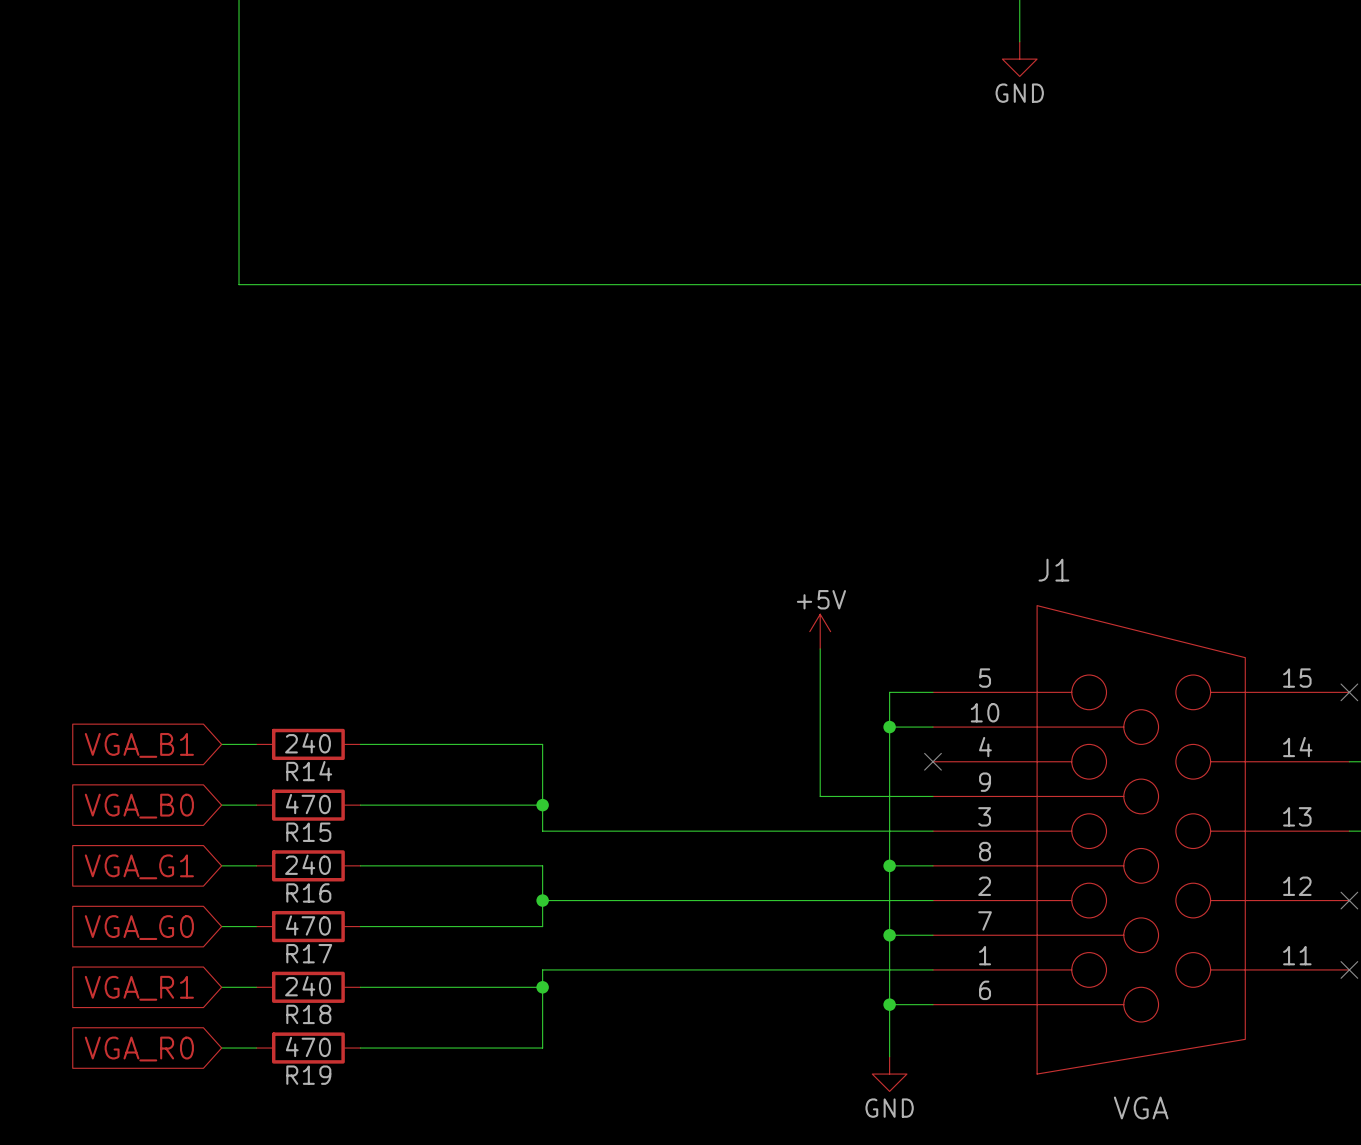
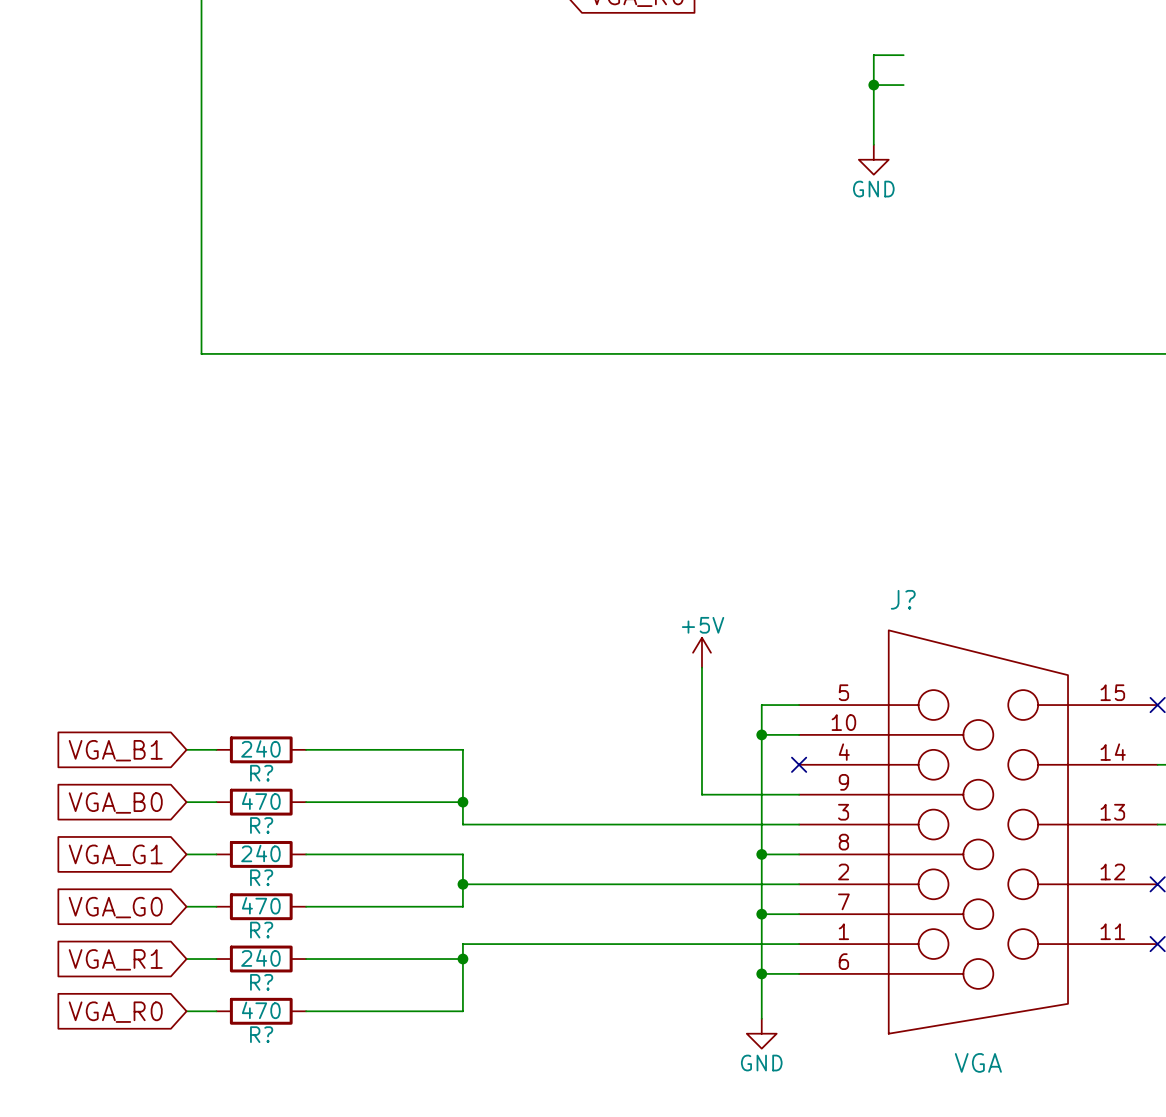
J1 name: J1 (1053, 570) -> J? (903, 599)
R14 name: R14 (309, 771) -> R? (261, 773)
R15 name: R15 (308, 832) -> R? (261, 825)
R16 name: R16 (308, 892) -> R? (261, 877)
R17 name: R17 (309, 953) -> R? (261, 930)
R18 name: R18 (308, 1014) -> R? (261, 982)
R19 name: R19 (308, 1075) -> R? (261, 1034)

